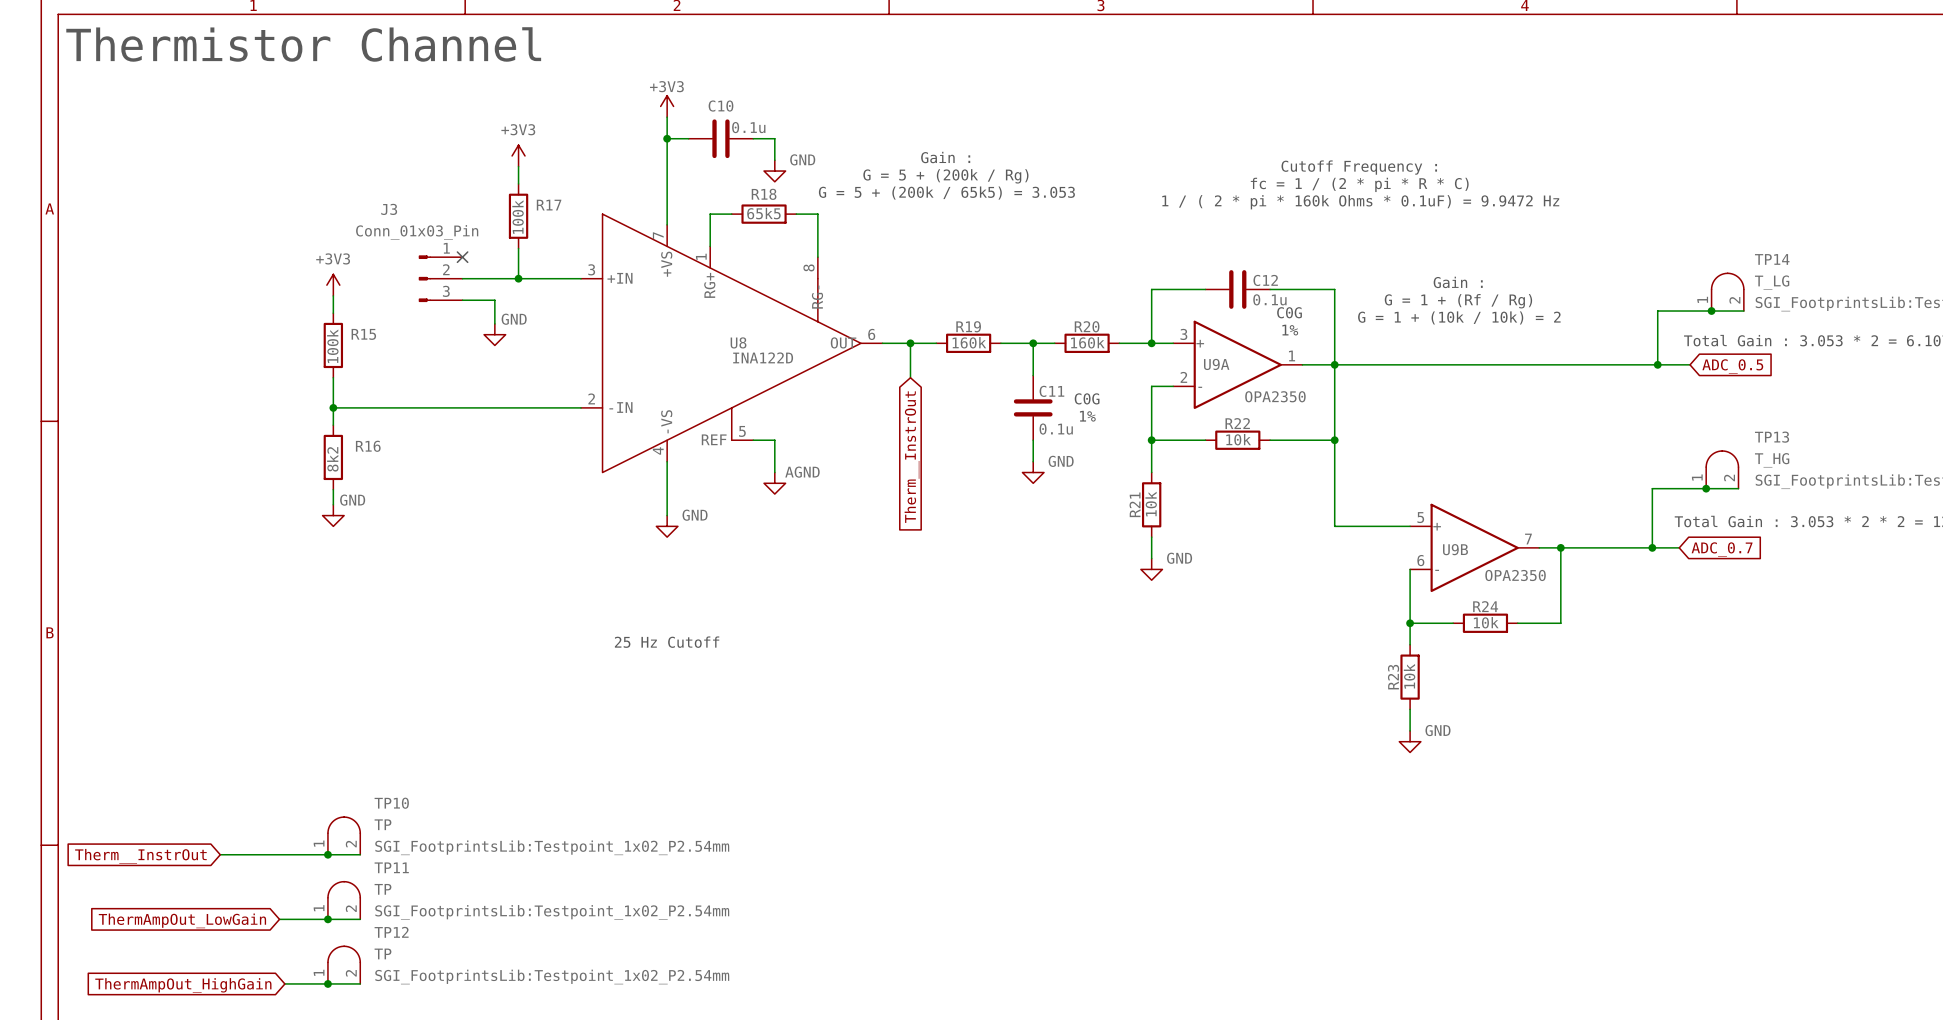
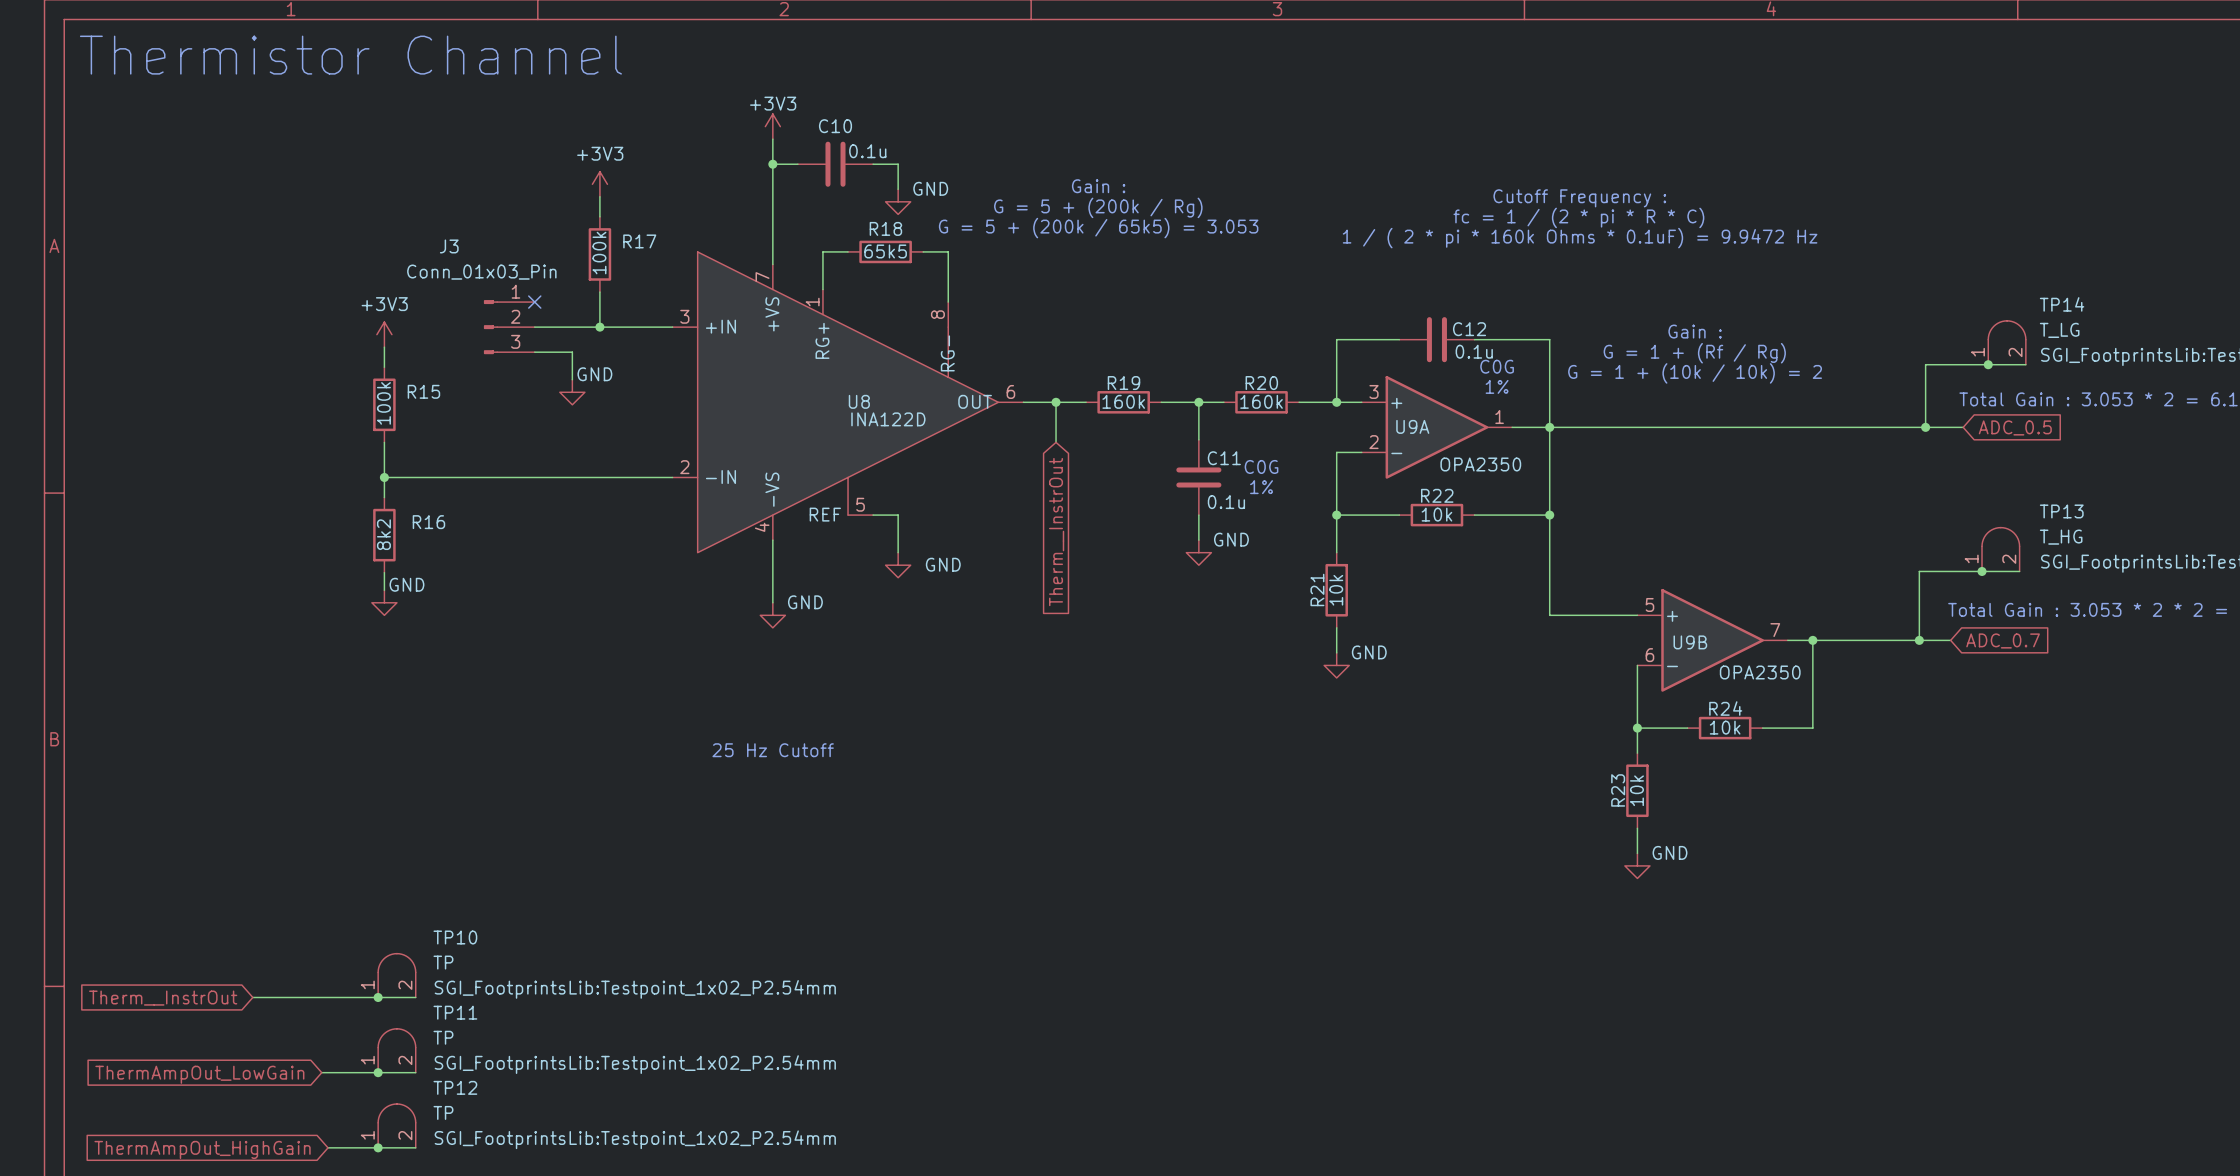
power symbol: AGND (774, 483) -> GND (898, 565)

